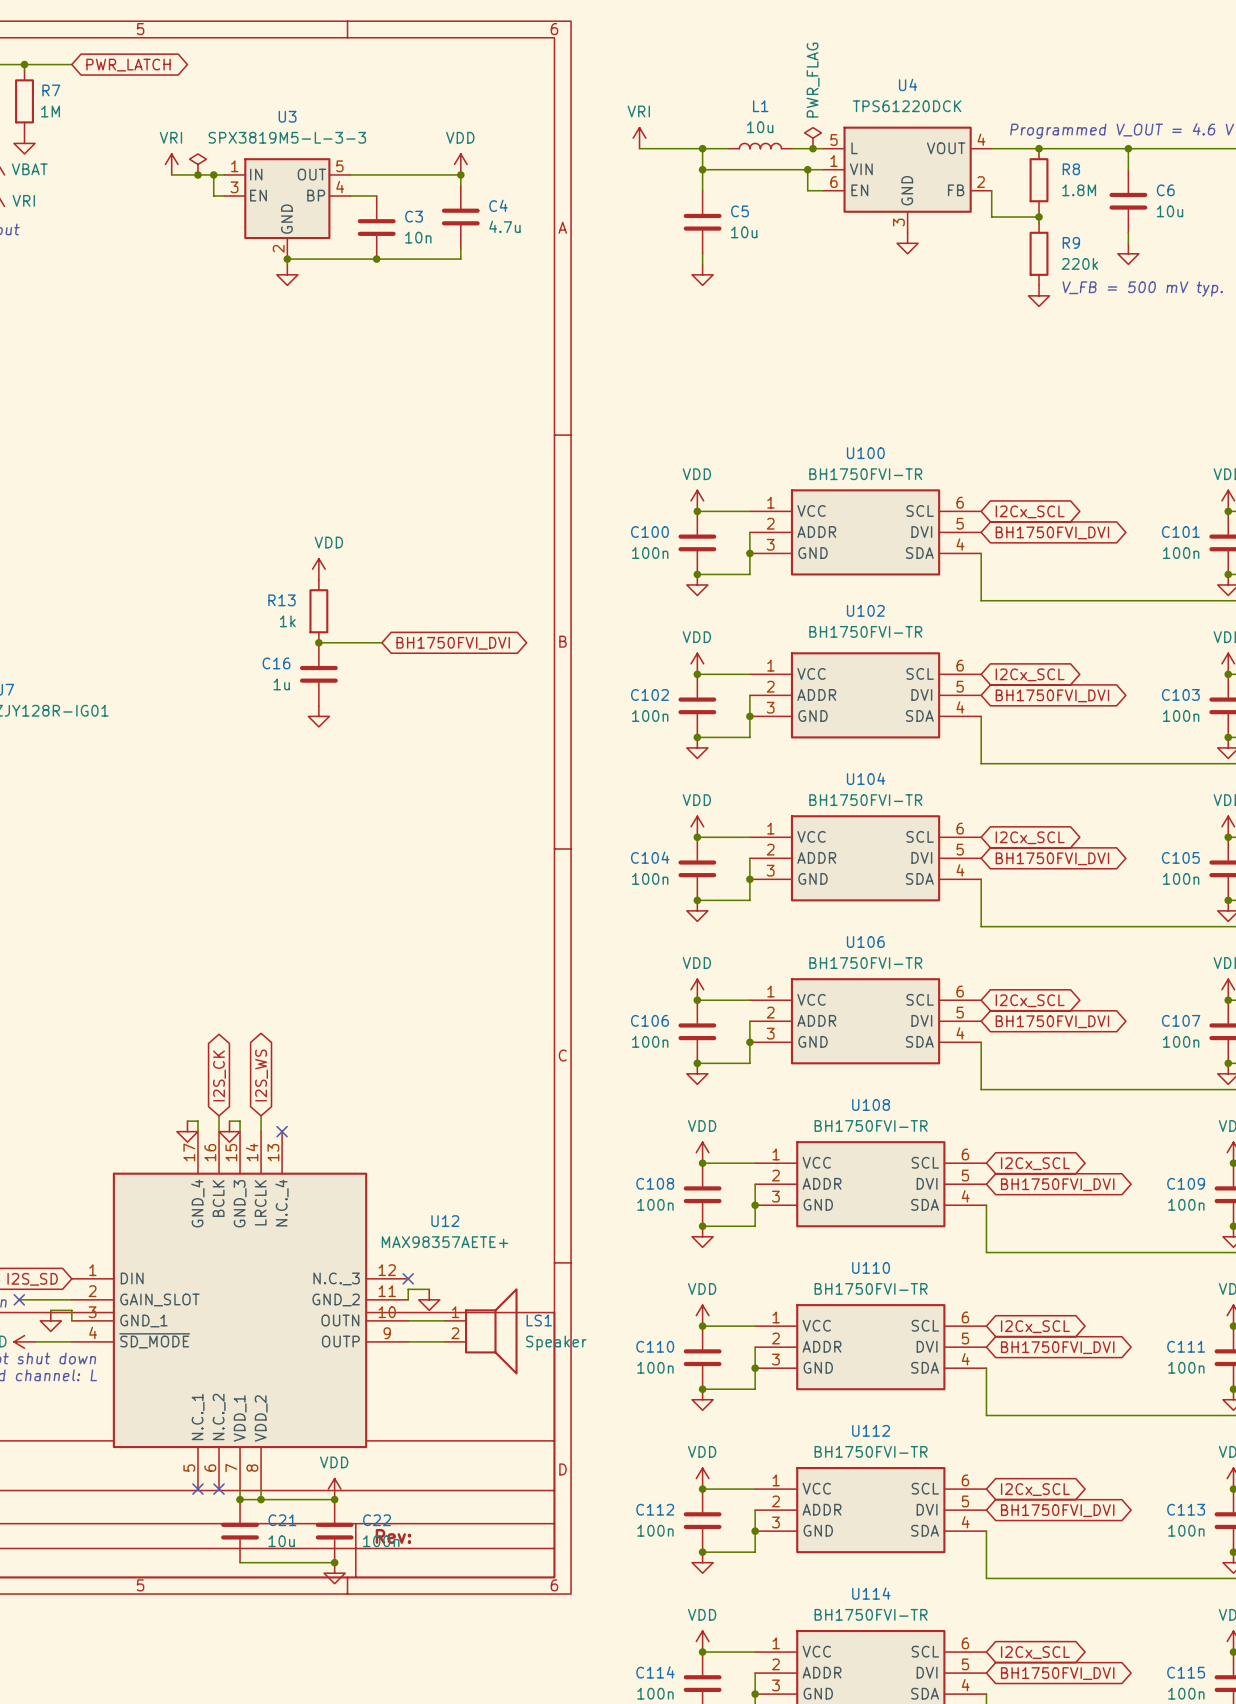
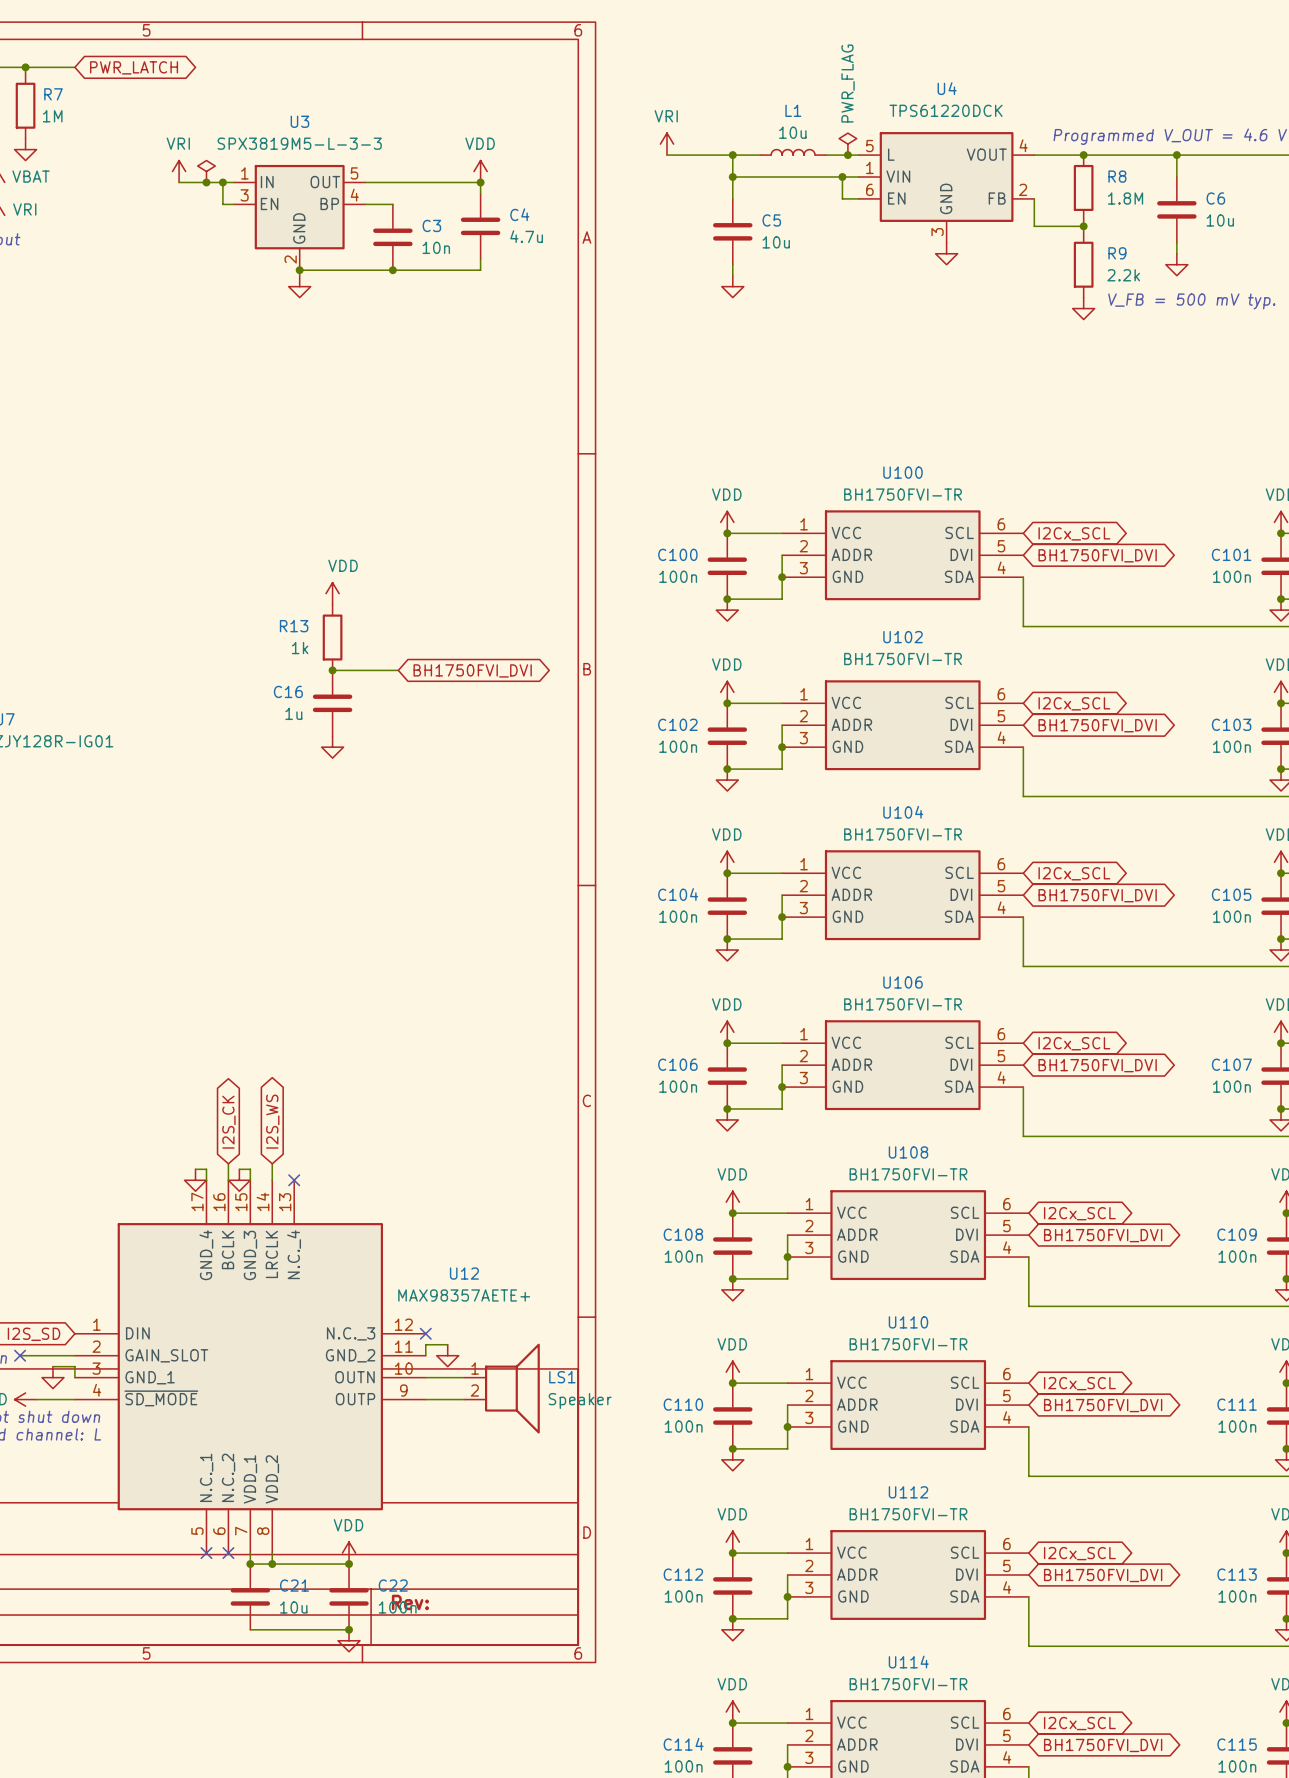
R9 value: 220k (1079, 263) -> 2.2k (1123, 275)

